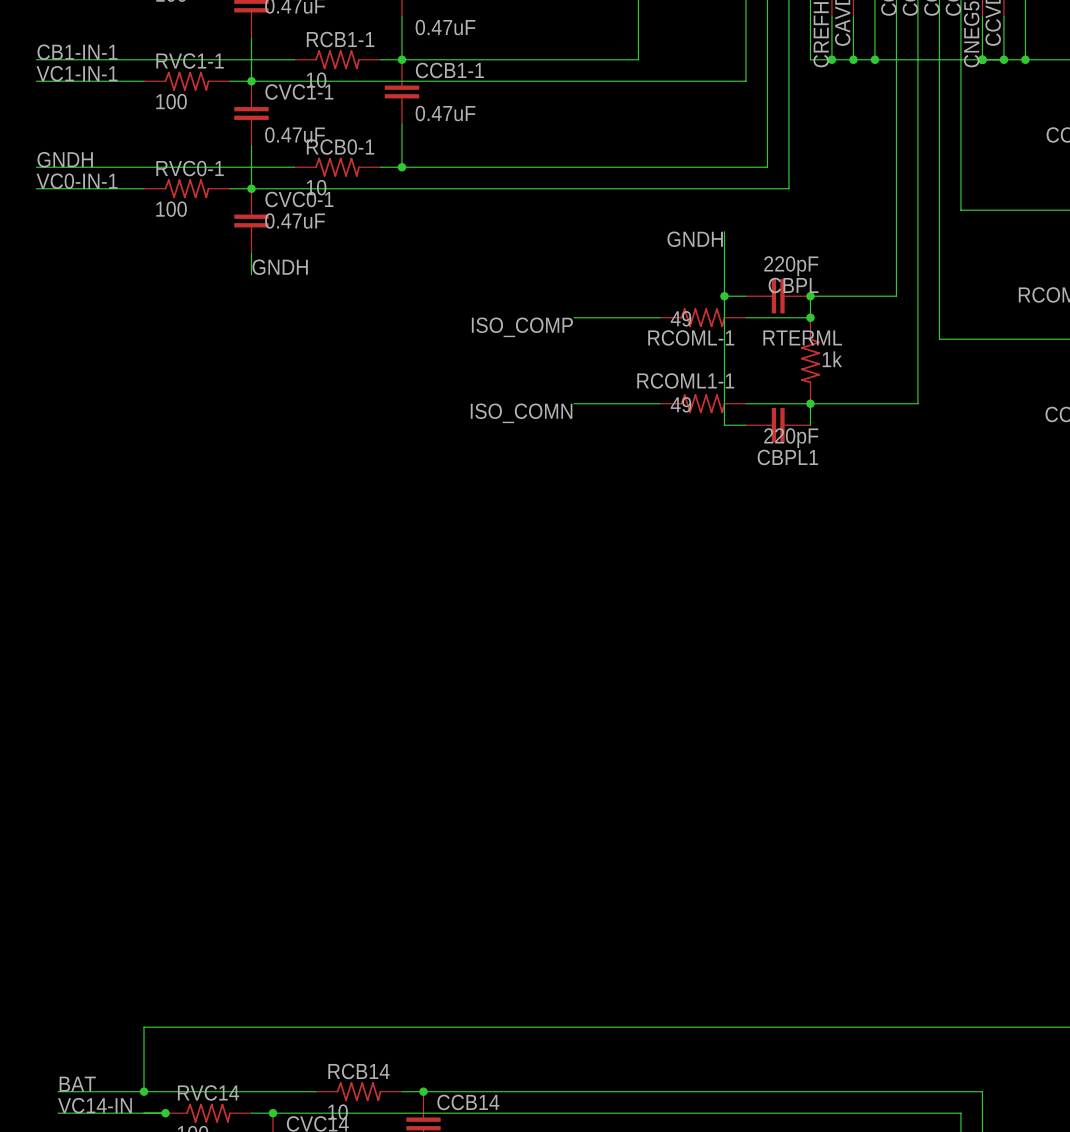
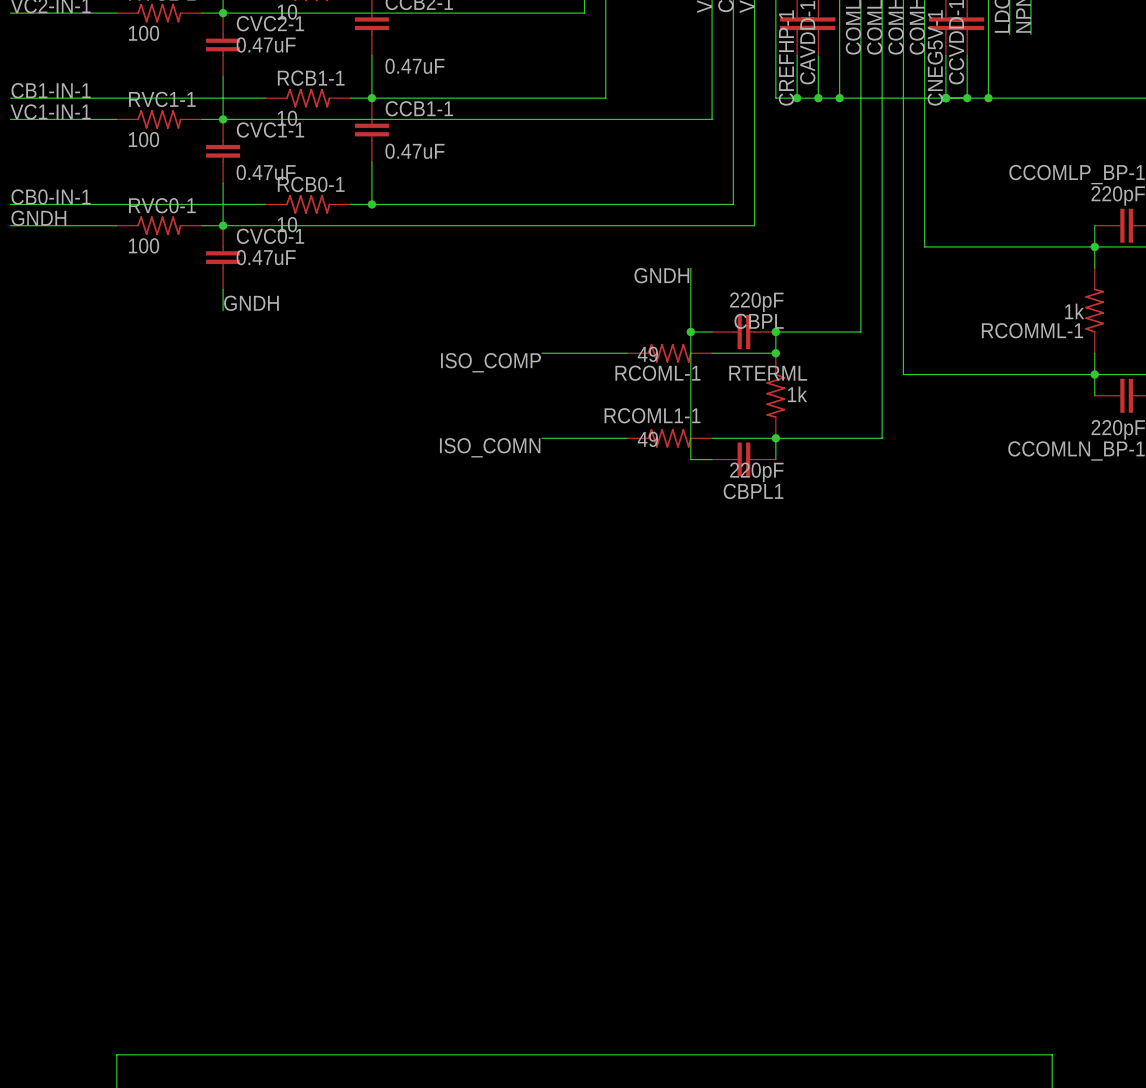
label: GNDH (65, 159) -> CB0-IN-1 (51, 196)
label: VC0-IN-1 (77, 181) -> GNDH (38, 218)

